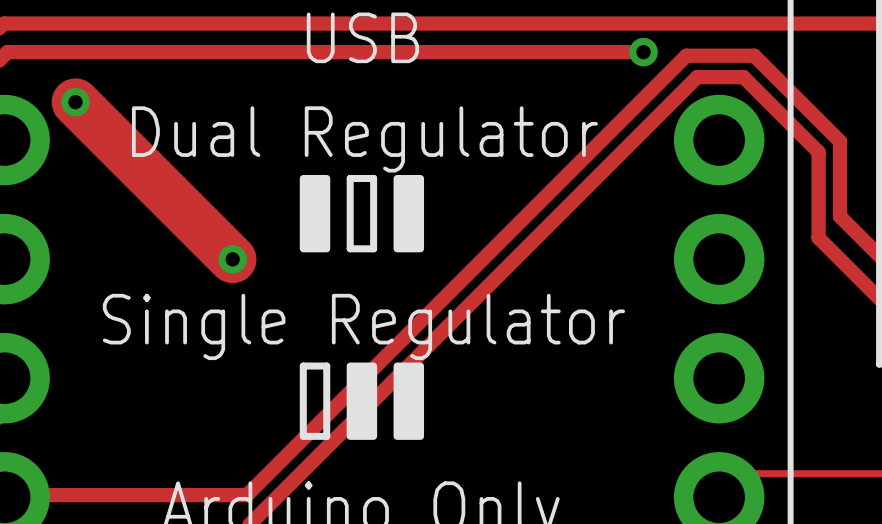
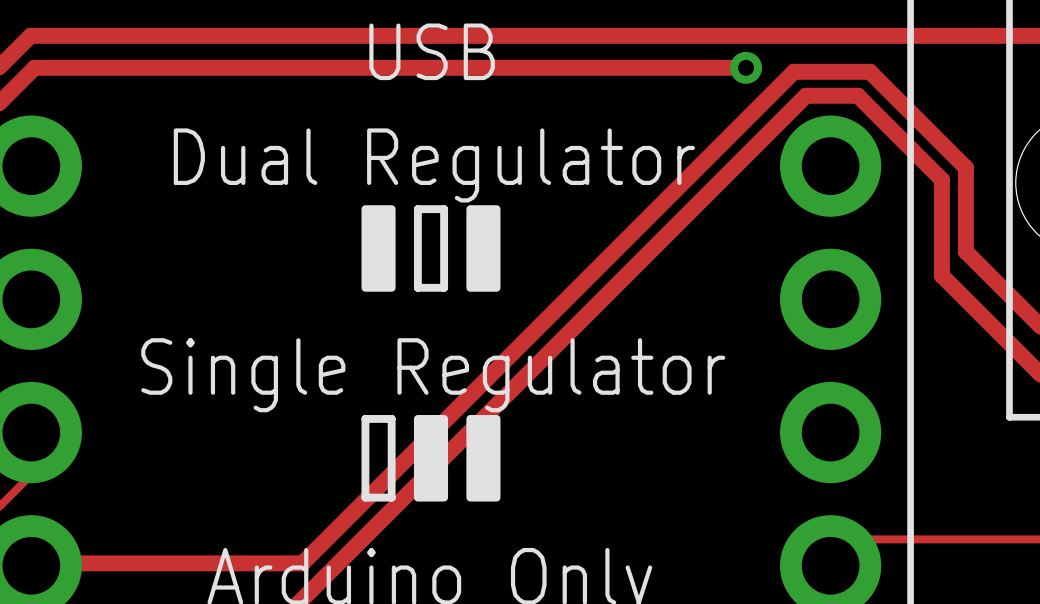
track: (75, 102) (232, 259) -> none
via: (75, 102) -> none
via: (232, 259) -> none

